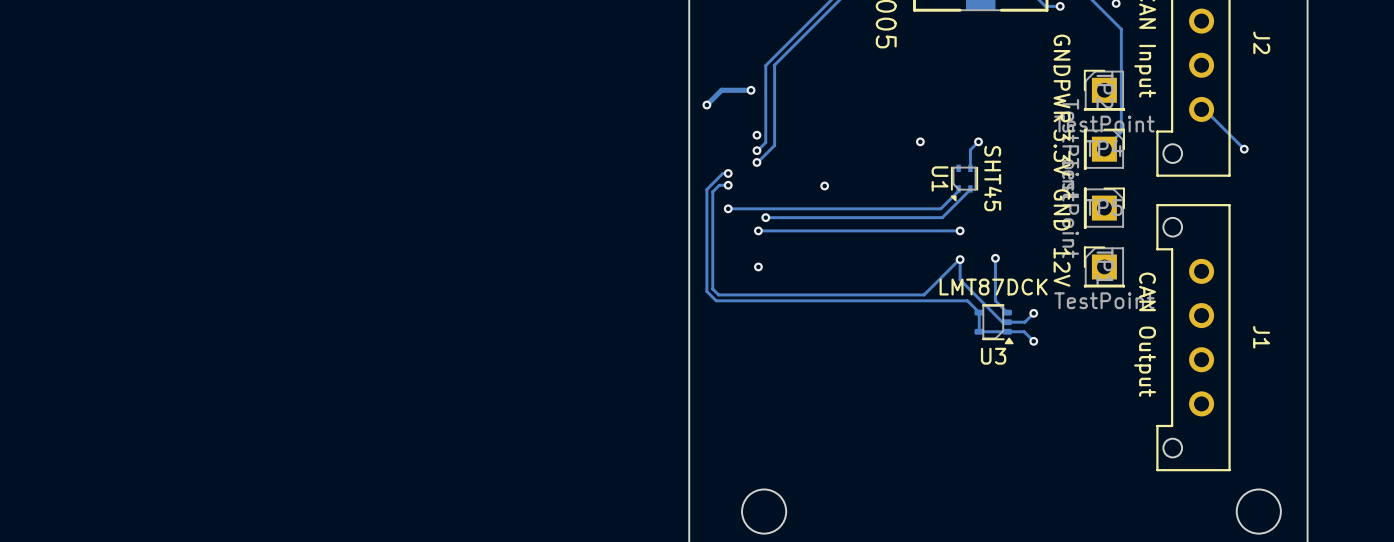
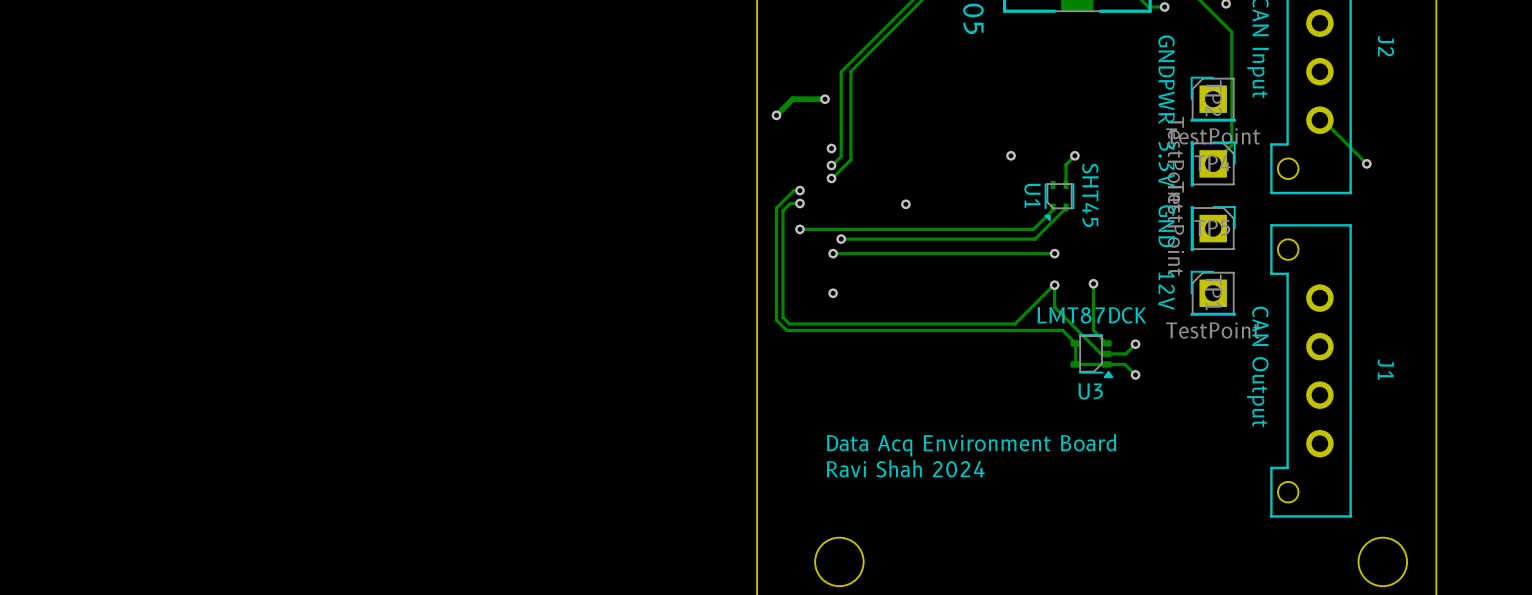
text: none -> Data Acq Environment Board (971, 445)
text: none -> Ravi Shah 2024 (905, 468)

